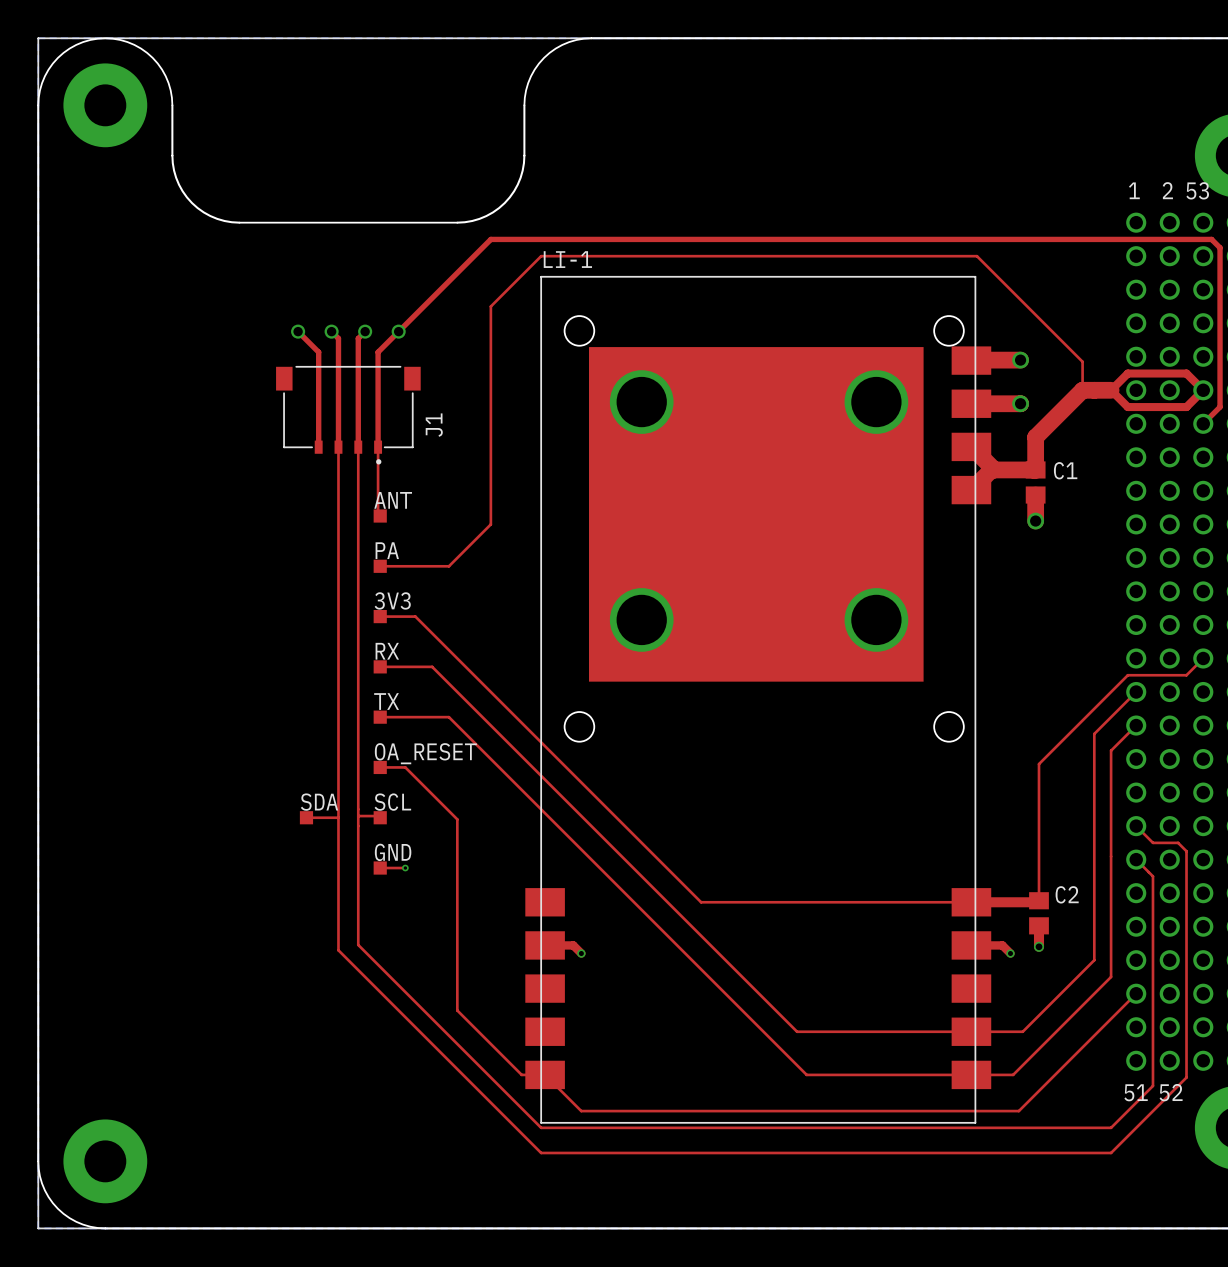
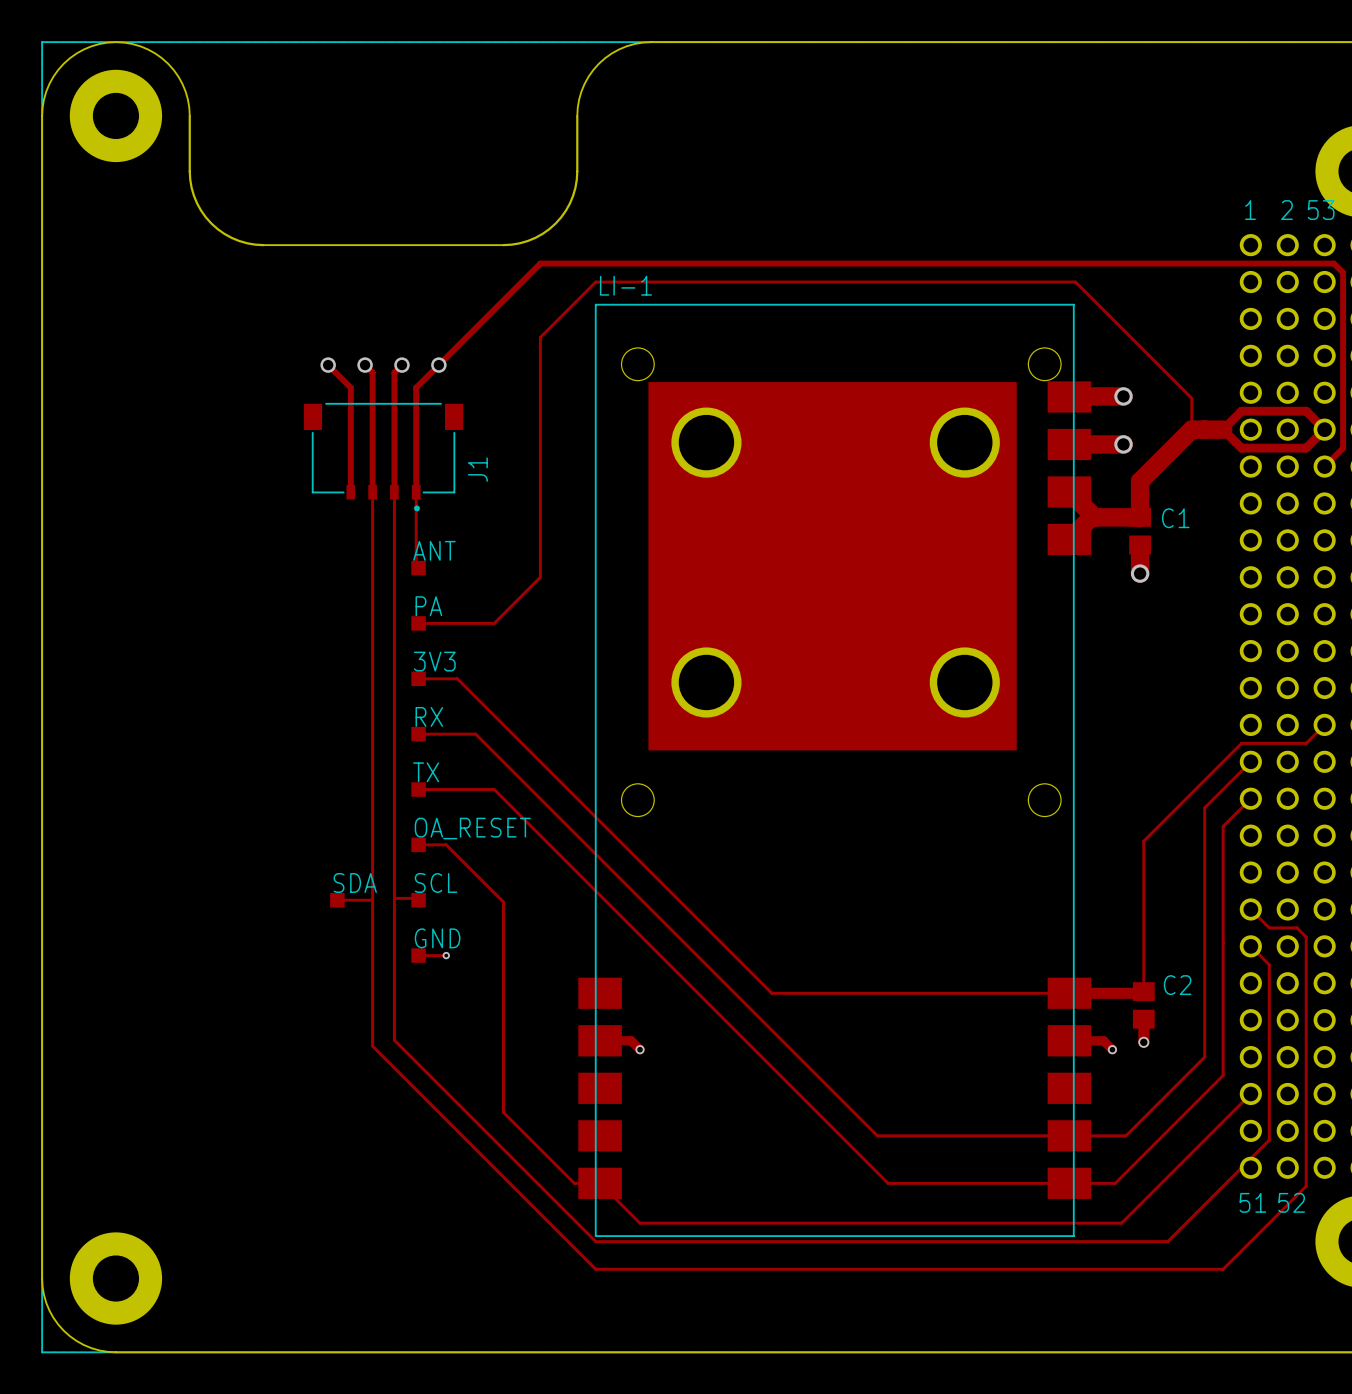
top track: (1152, 1035) (1152, 1085) (1111, 1127) (1060, 1127) -> (1269, 1140) (1167, 1241)

